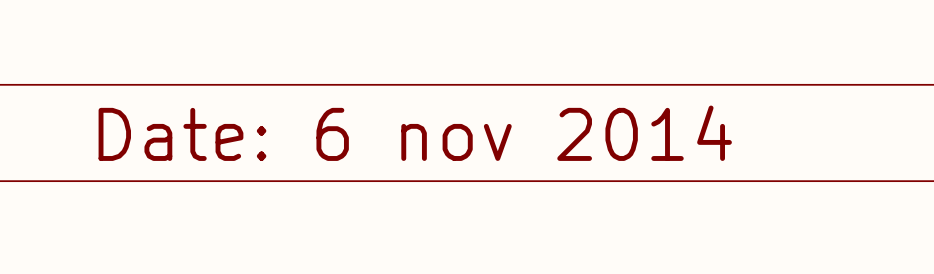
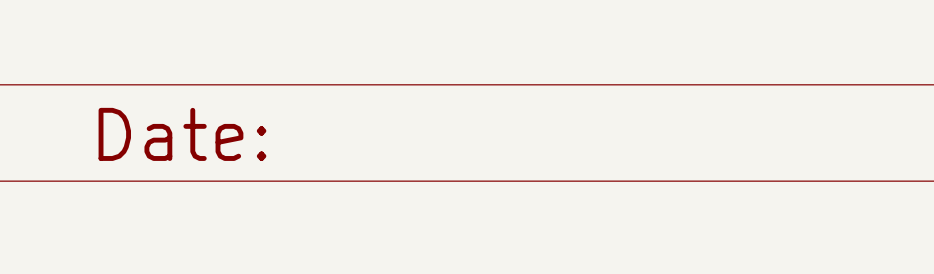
title block: Date: 6 nov 2014 (415, 133) -> Date: (182, 134)

